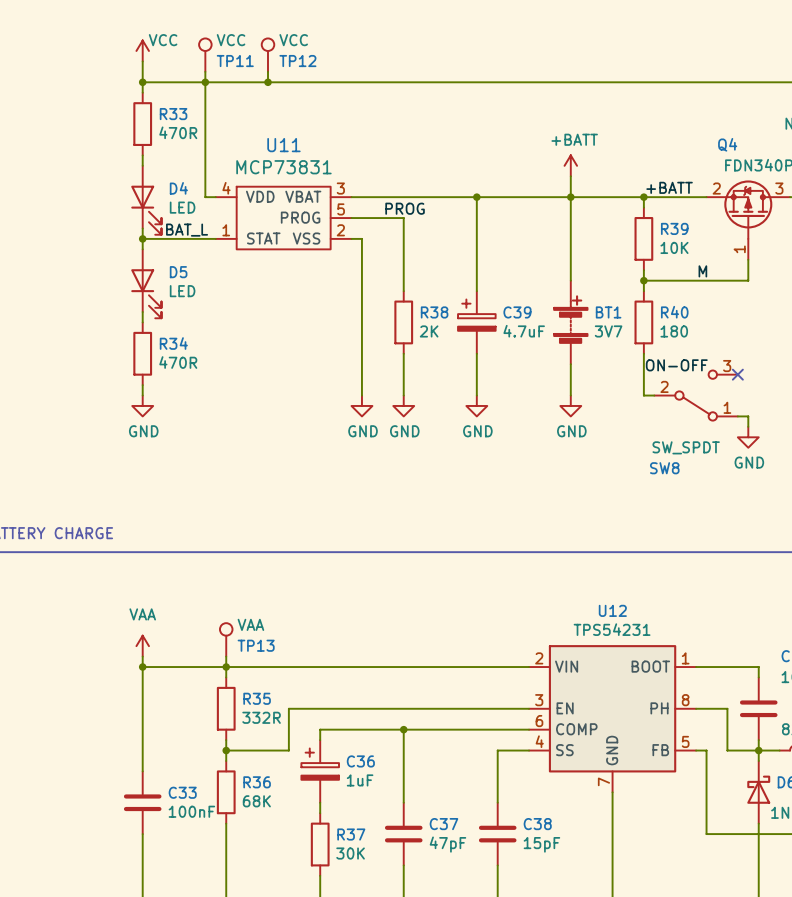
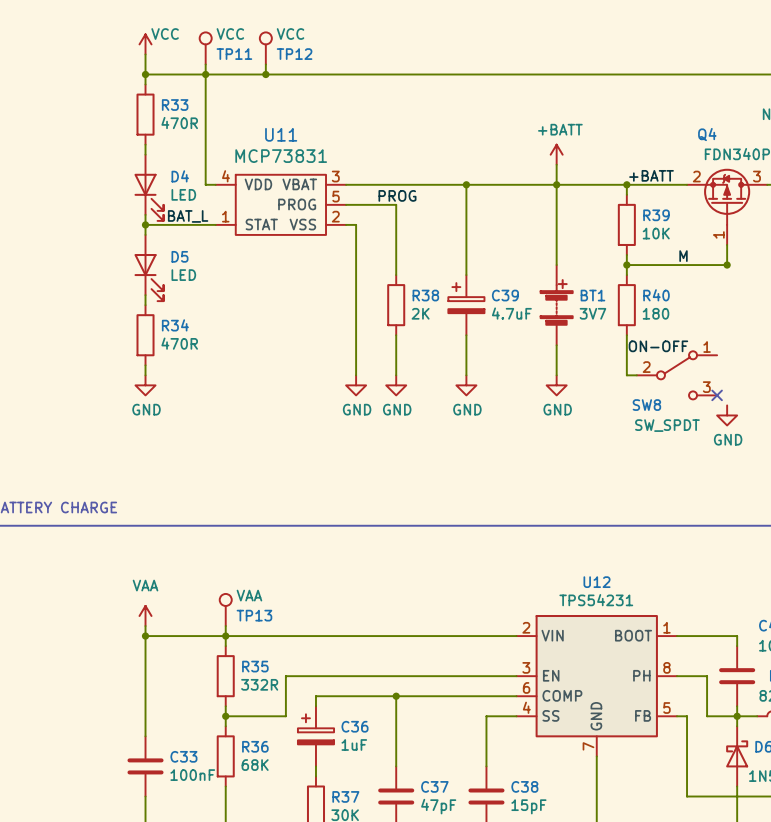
junction: none -> (727, 265)
no-connect mark position: (737, 374) -> (717, 395)
SW8 flip: as is (696, 395) -> up-down (676, 375)
wire: (737, 416) (748, 416) (748, 426) -> none
SW8 name position: SW8 (664, 468) -> SW8 (646, 405)

